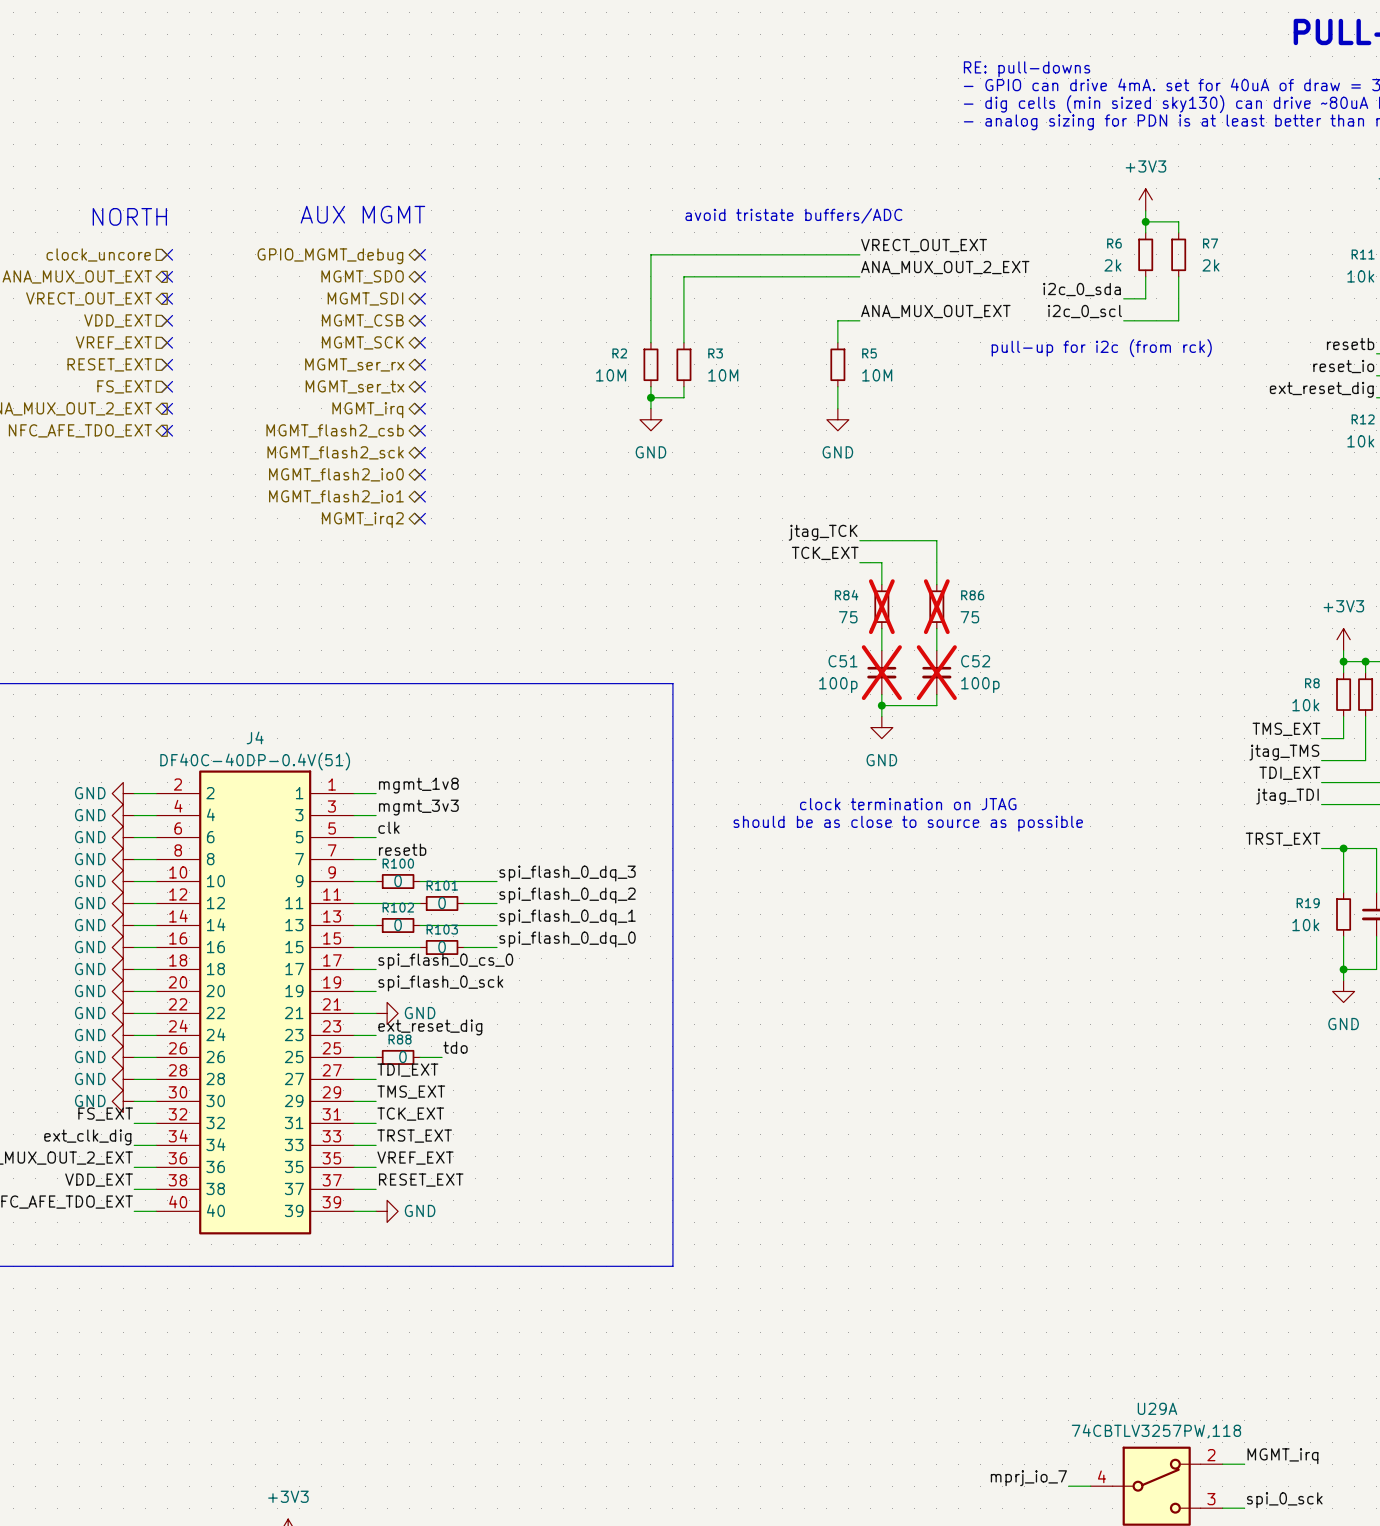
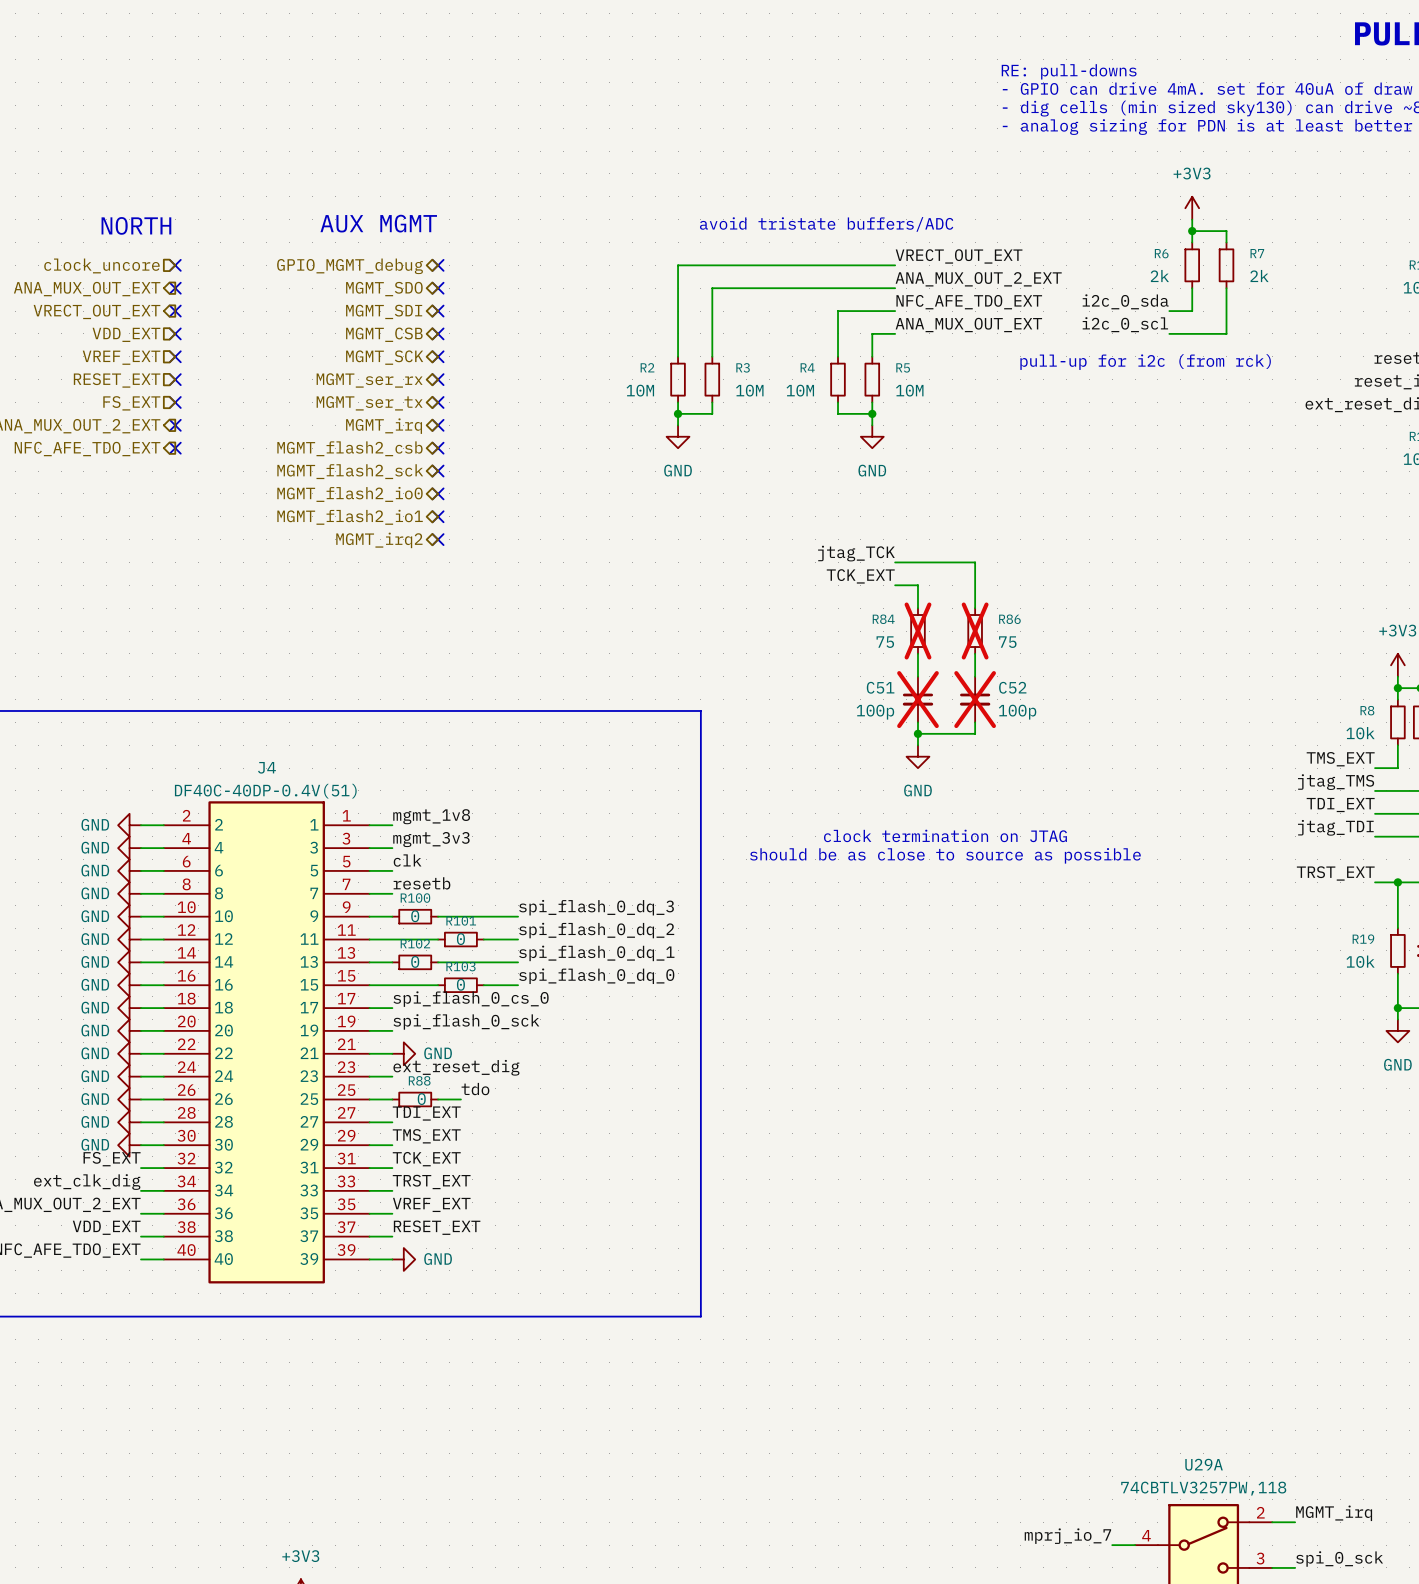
label: none -> NFC_AFE_TDO_EXT (969, 302)
wire: none -> (895, 311) (838, 311) (838, 356)
R4: none -> 10M (838, 379)
wire: none -> (838, 402) (838, 413) (872, 413)
junction: none -> (872, 413)

